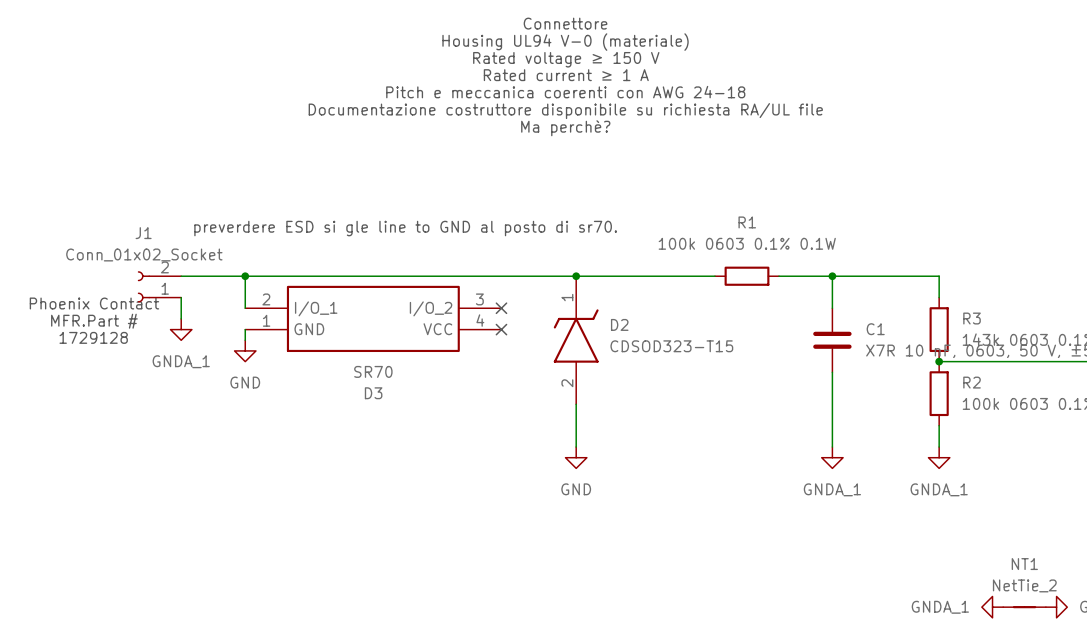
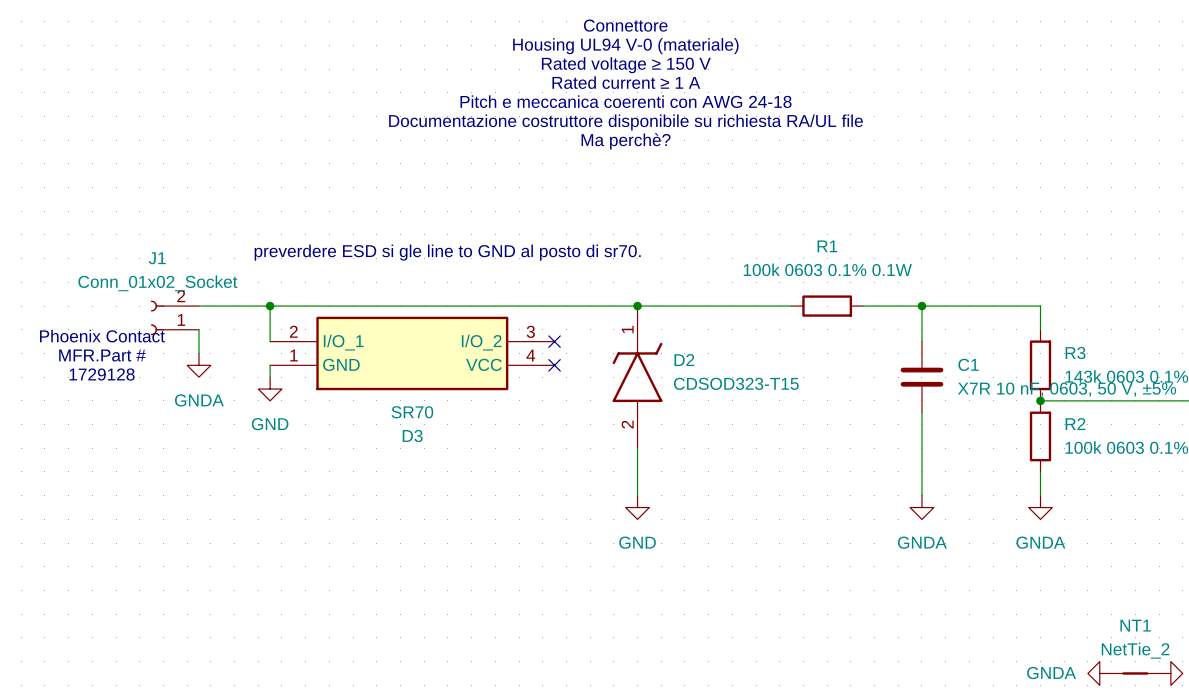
power symbol: GNDA_1 (181, 329) -> GNDA (198, 365)
power symbol: GNDA_1 (832, 457) -> GNDA (921, 507)
power symbol: GNDA_1 (939, 457) -> GNDA (1040, 507)
power symbol: GNDA_1 (992, 607) -> GNDA (1099, 673)

